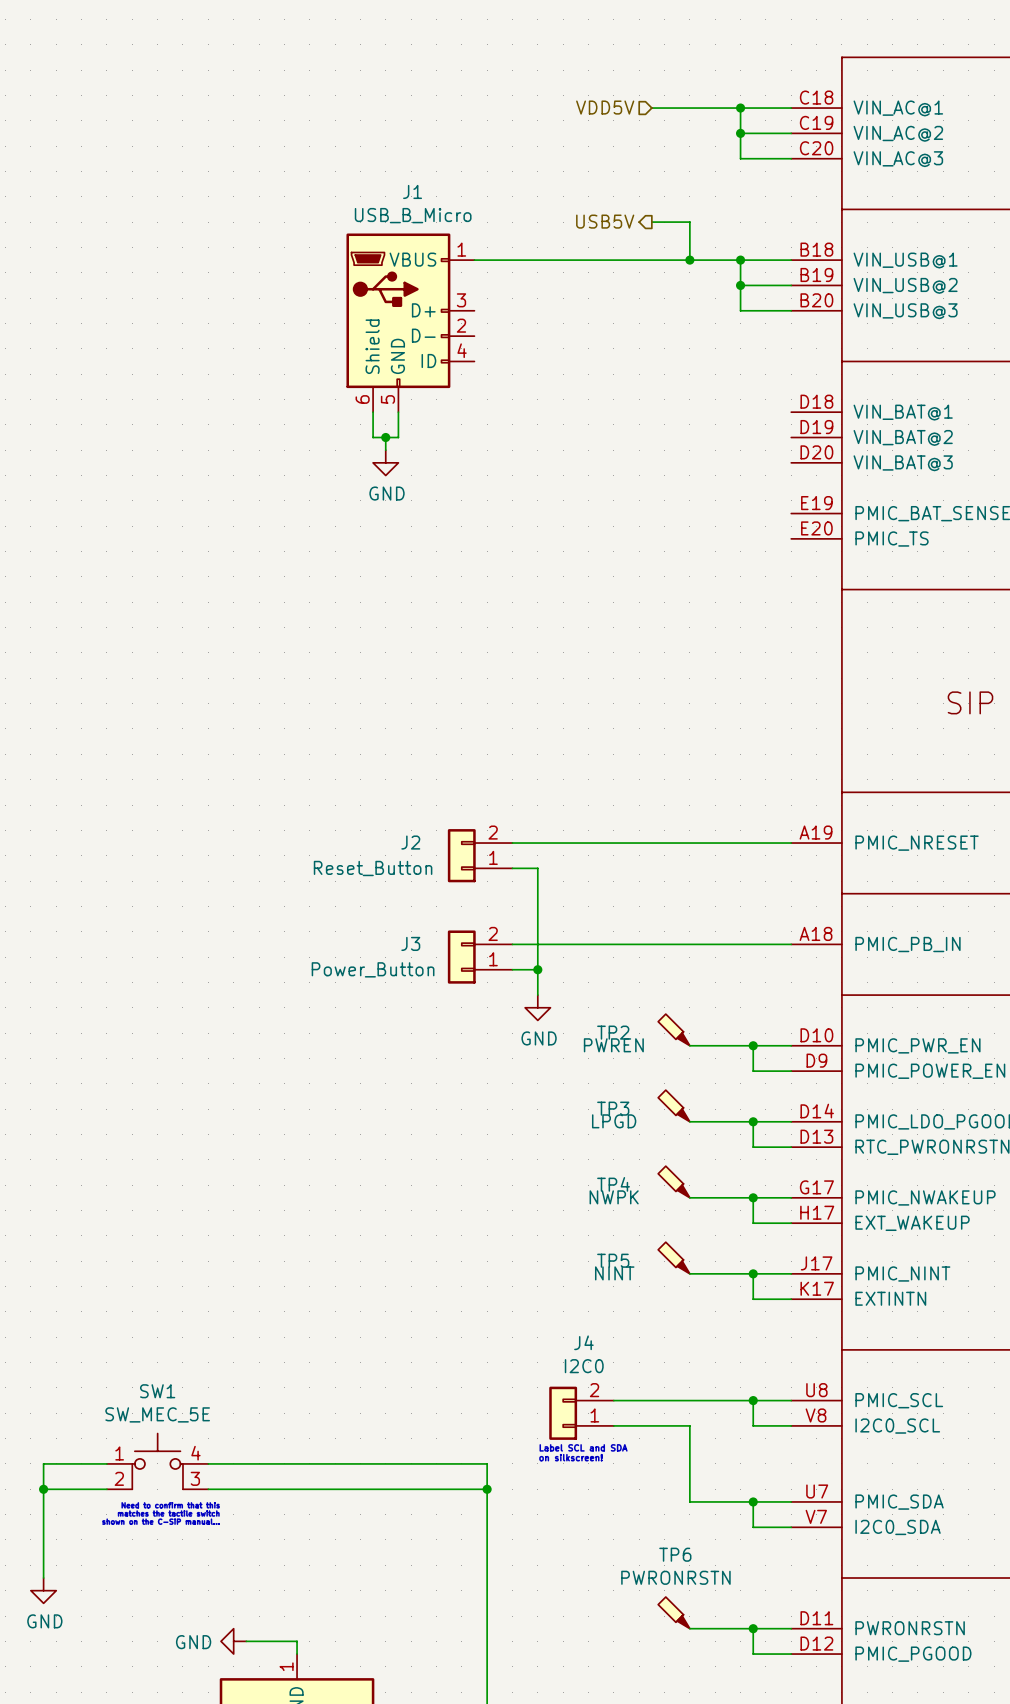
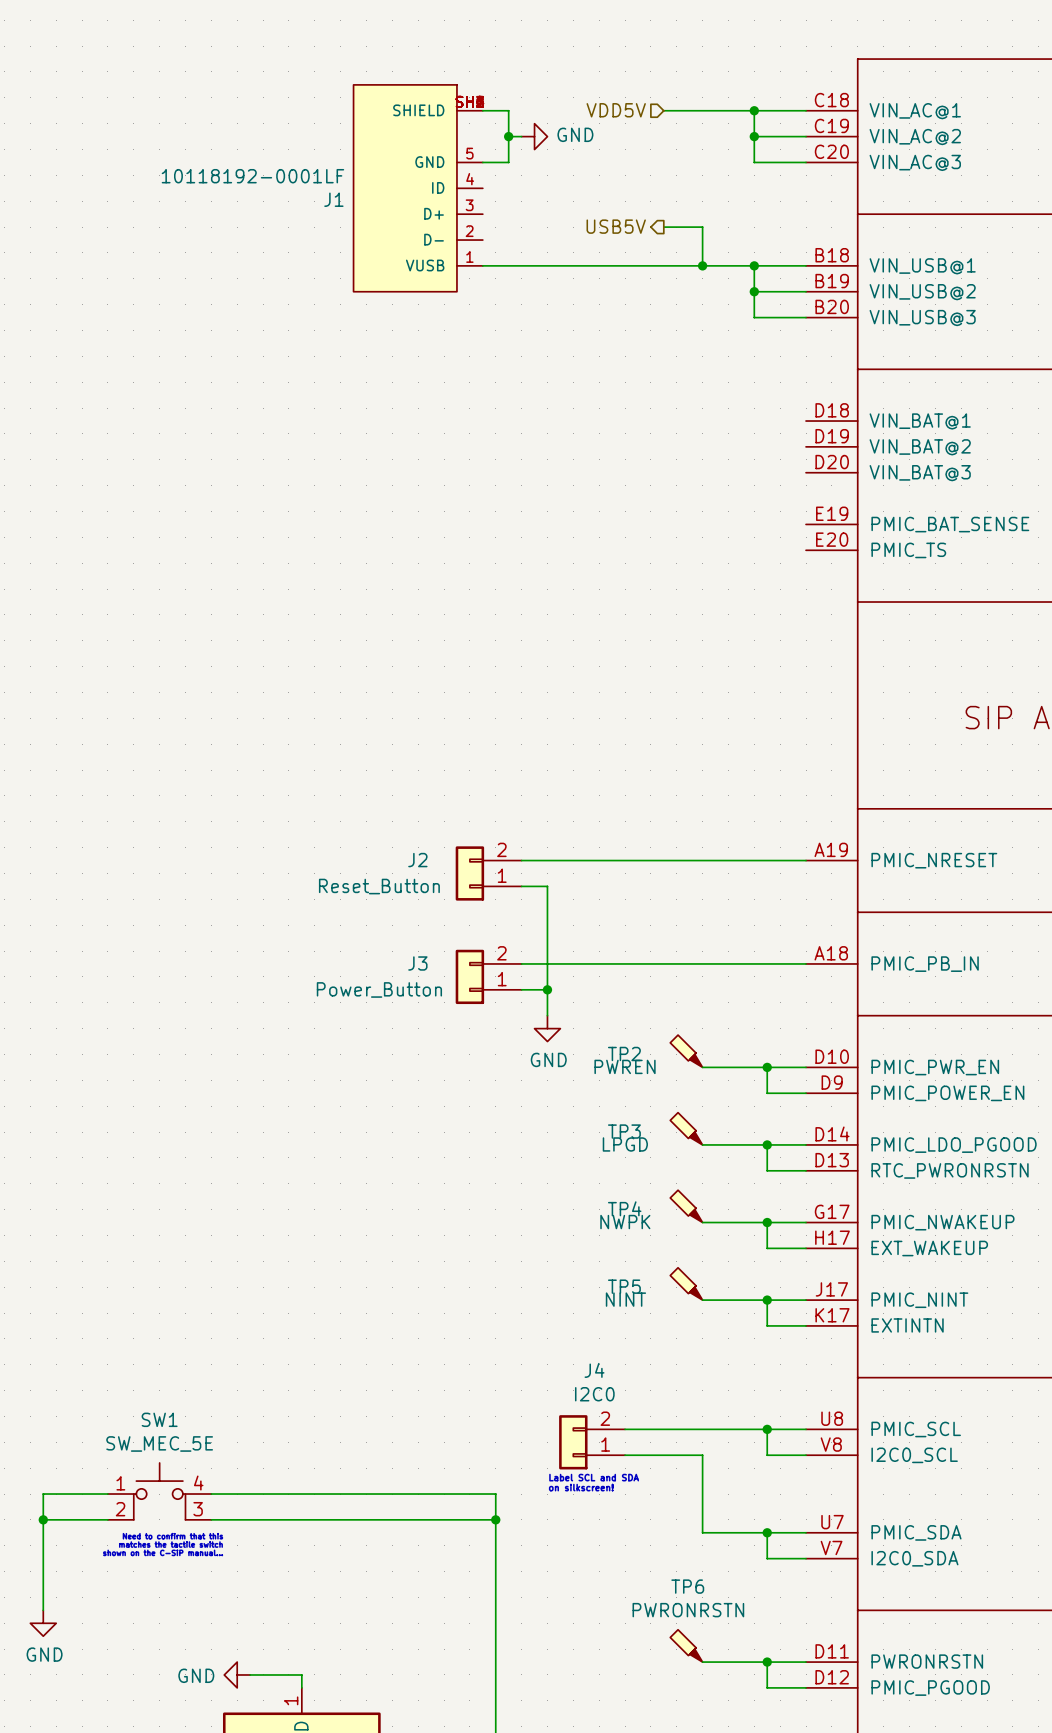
wire: none -> (482, 110) (508, 110) (508, 162) (482, 162)
wire: none -> (508, 136) (521, 136)
junction: none -> (508, 136)
power symbol: none -> GND (534, 136)
J1 name position: J1 (412, 191) -> J1 (333, 199)
J1 value: USB_B_Micro (413, 215) -> 10118192-0001LF (252, 176)
J1 symbol: [346, 233, 475, 413] -> [352, 84, 483, 293]
wire: (373, 412) (373, 437) (398, 437) (398, 412) -> none
wire: (385, 437) (385, 450) -> none
junction: (385, 437) -> none
power symbol: GND (385, 462) -> none

